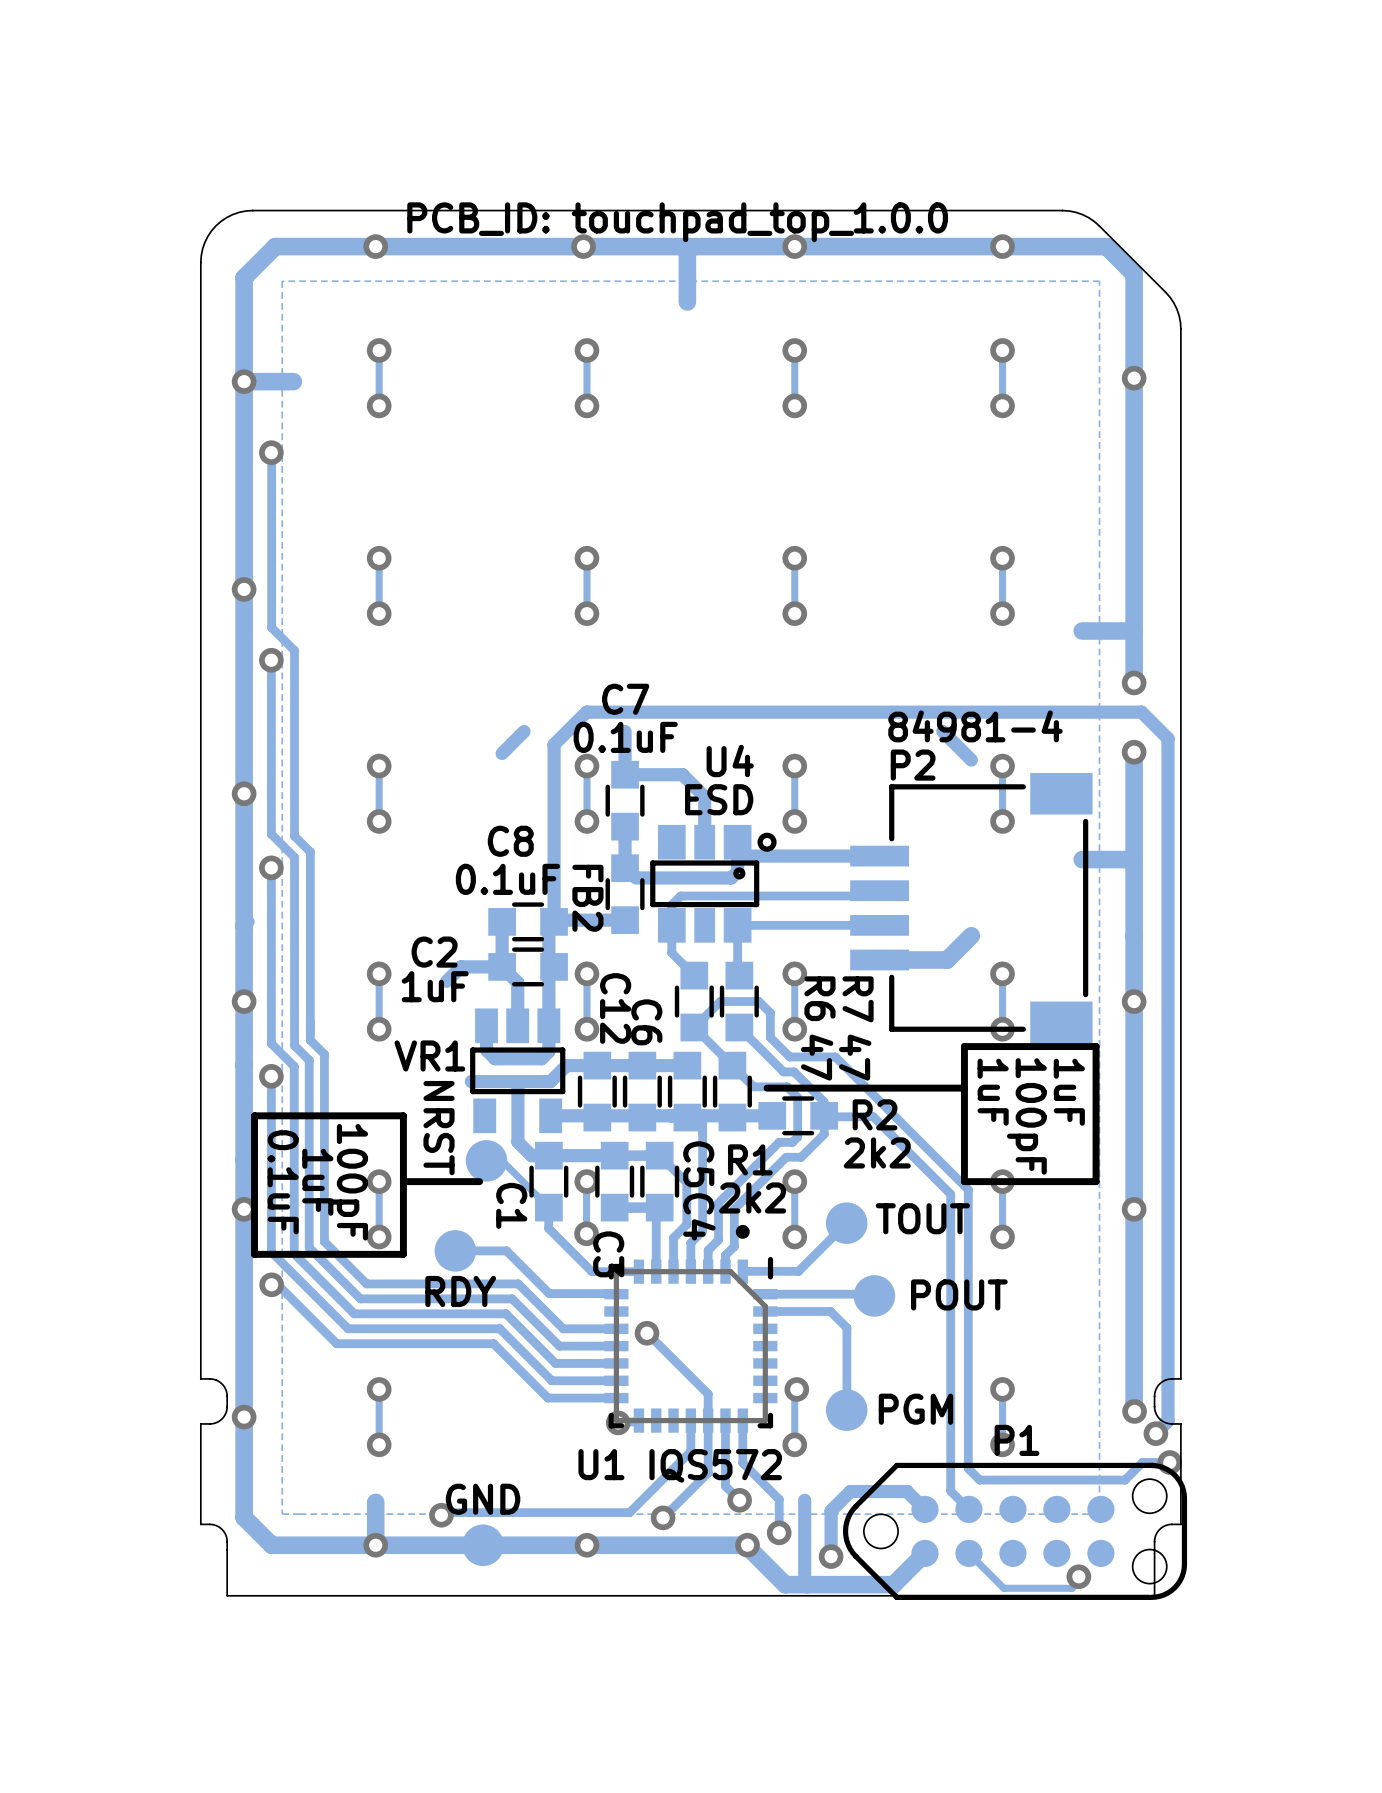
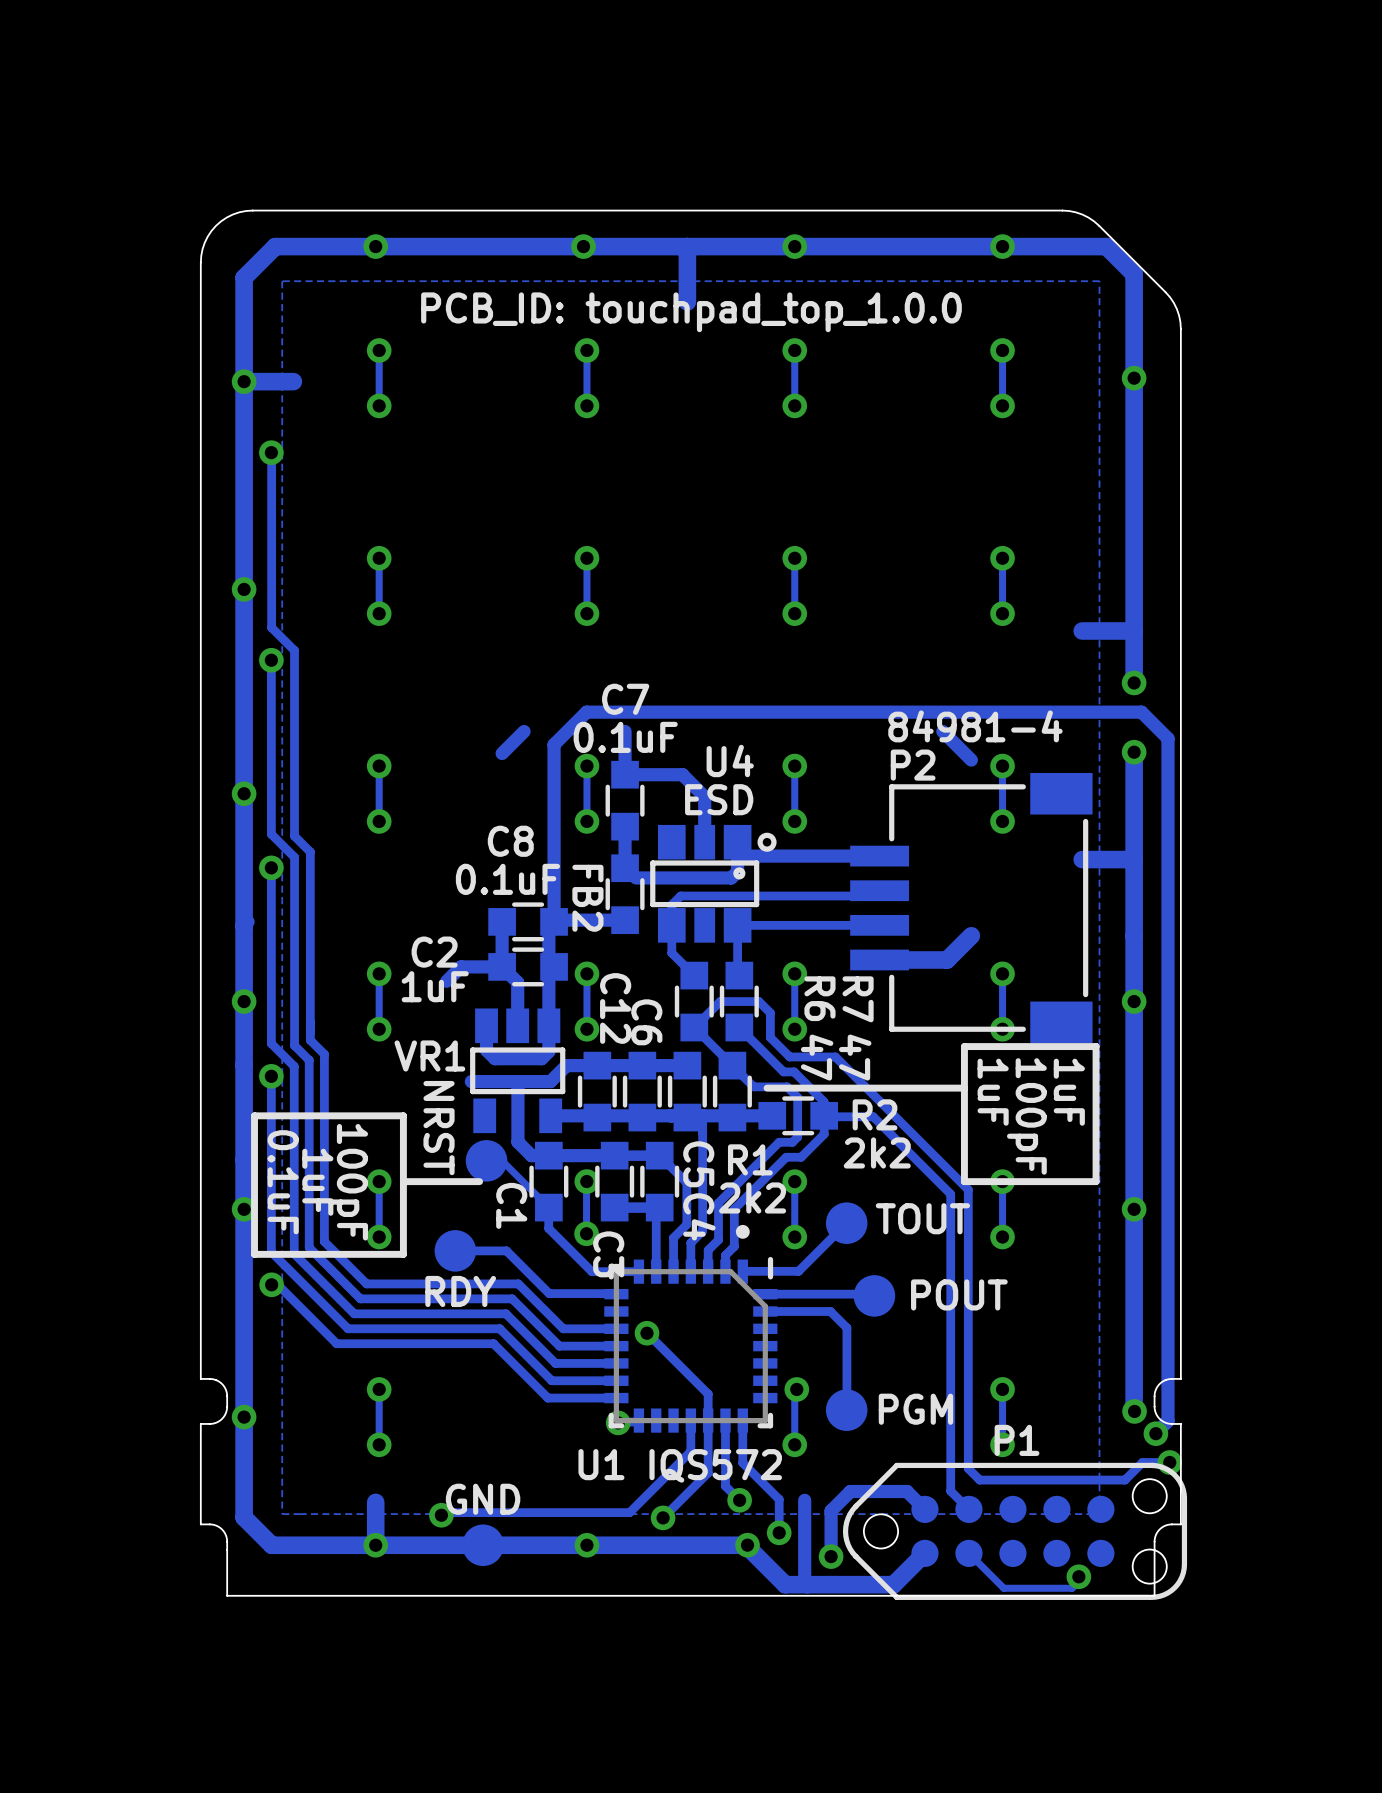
text position: PCB_ID: touchpad_top_1.0.0 (677, 222) -> PCB_ID: touchpad_top_1.0.0 (691, 312)

